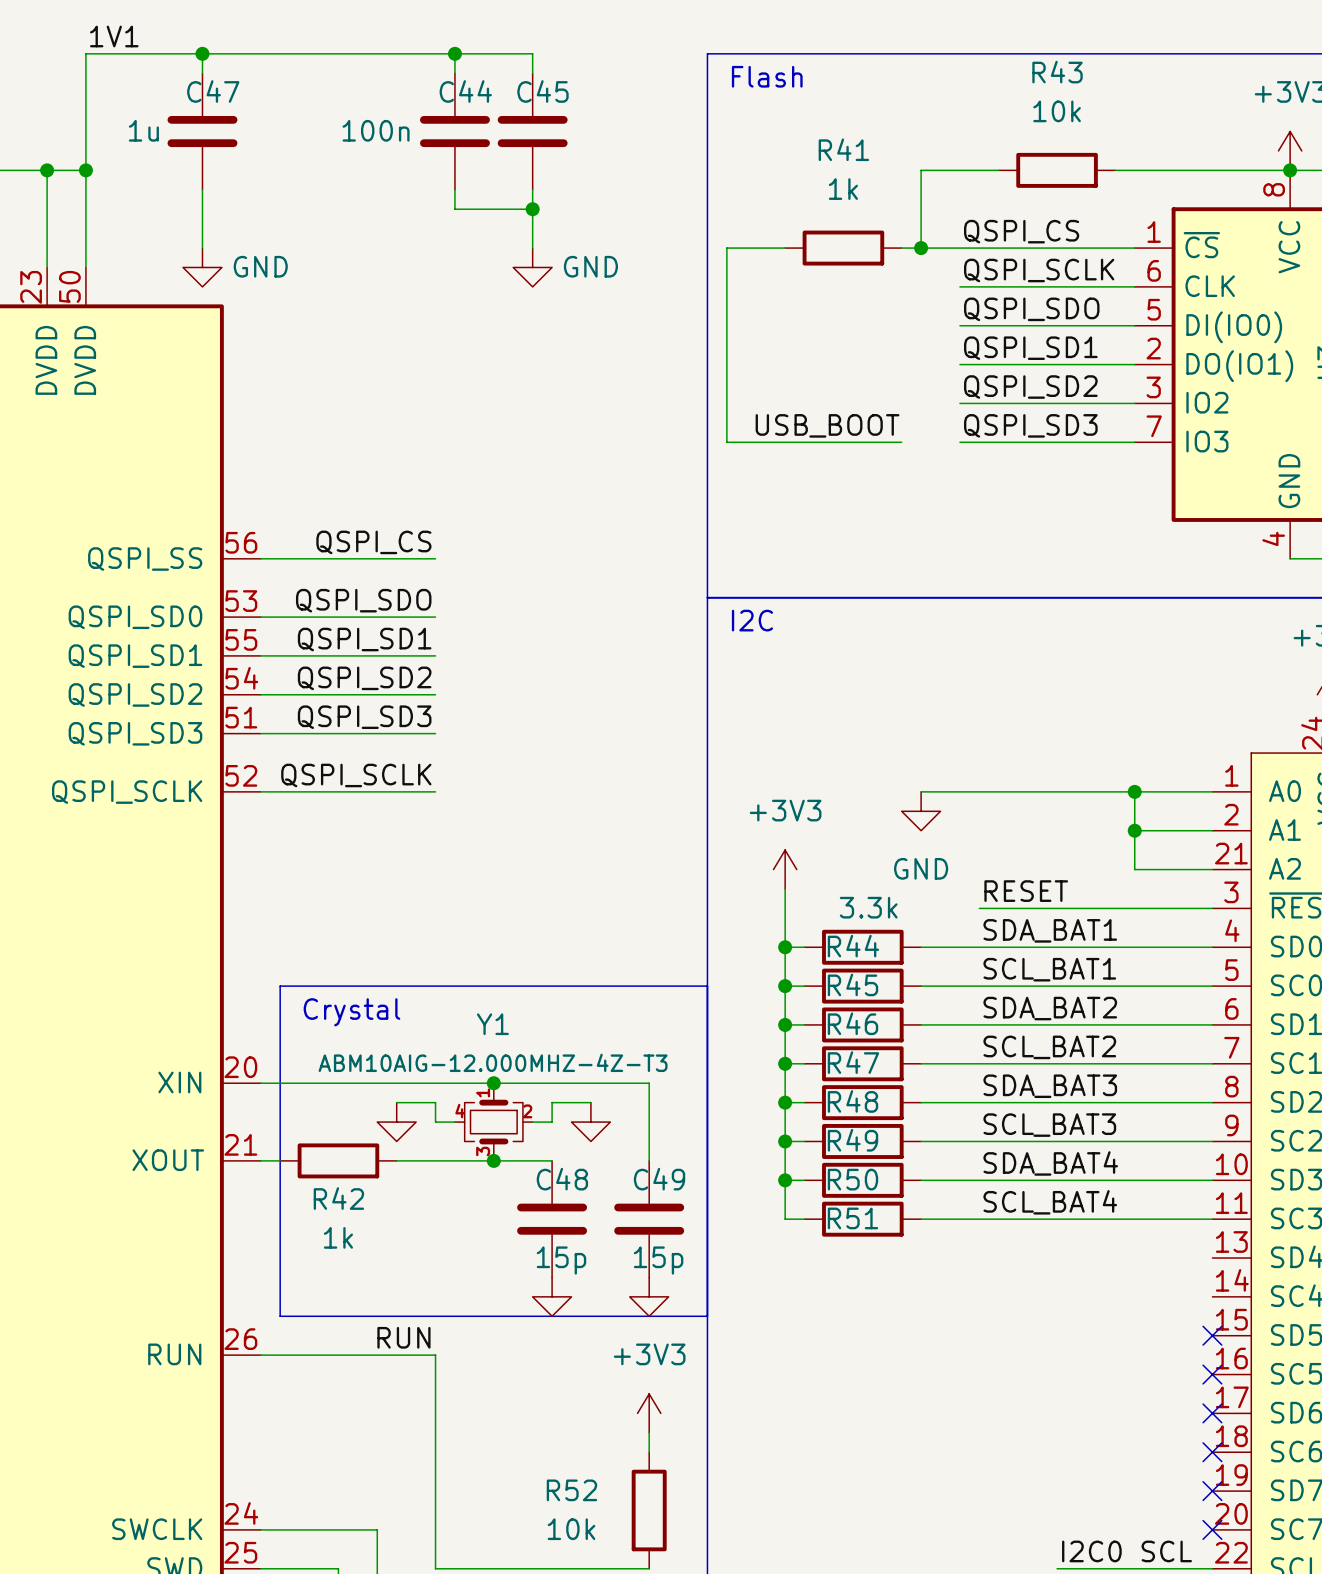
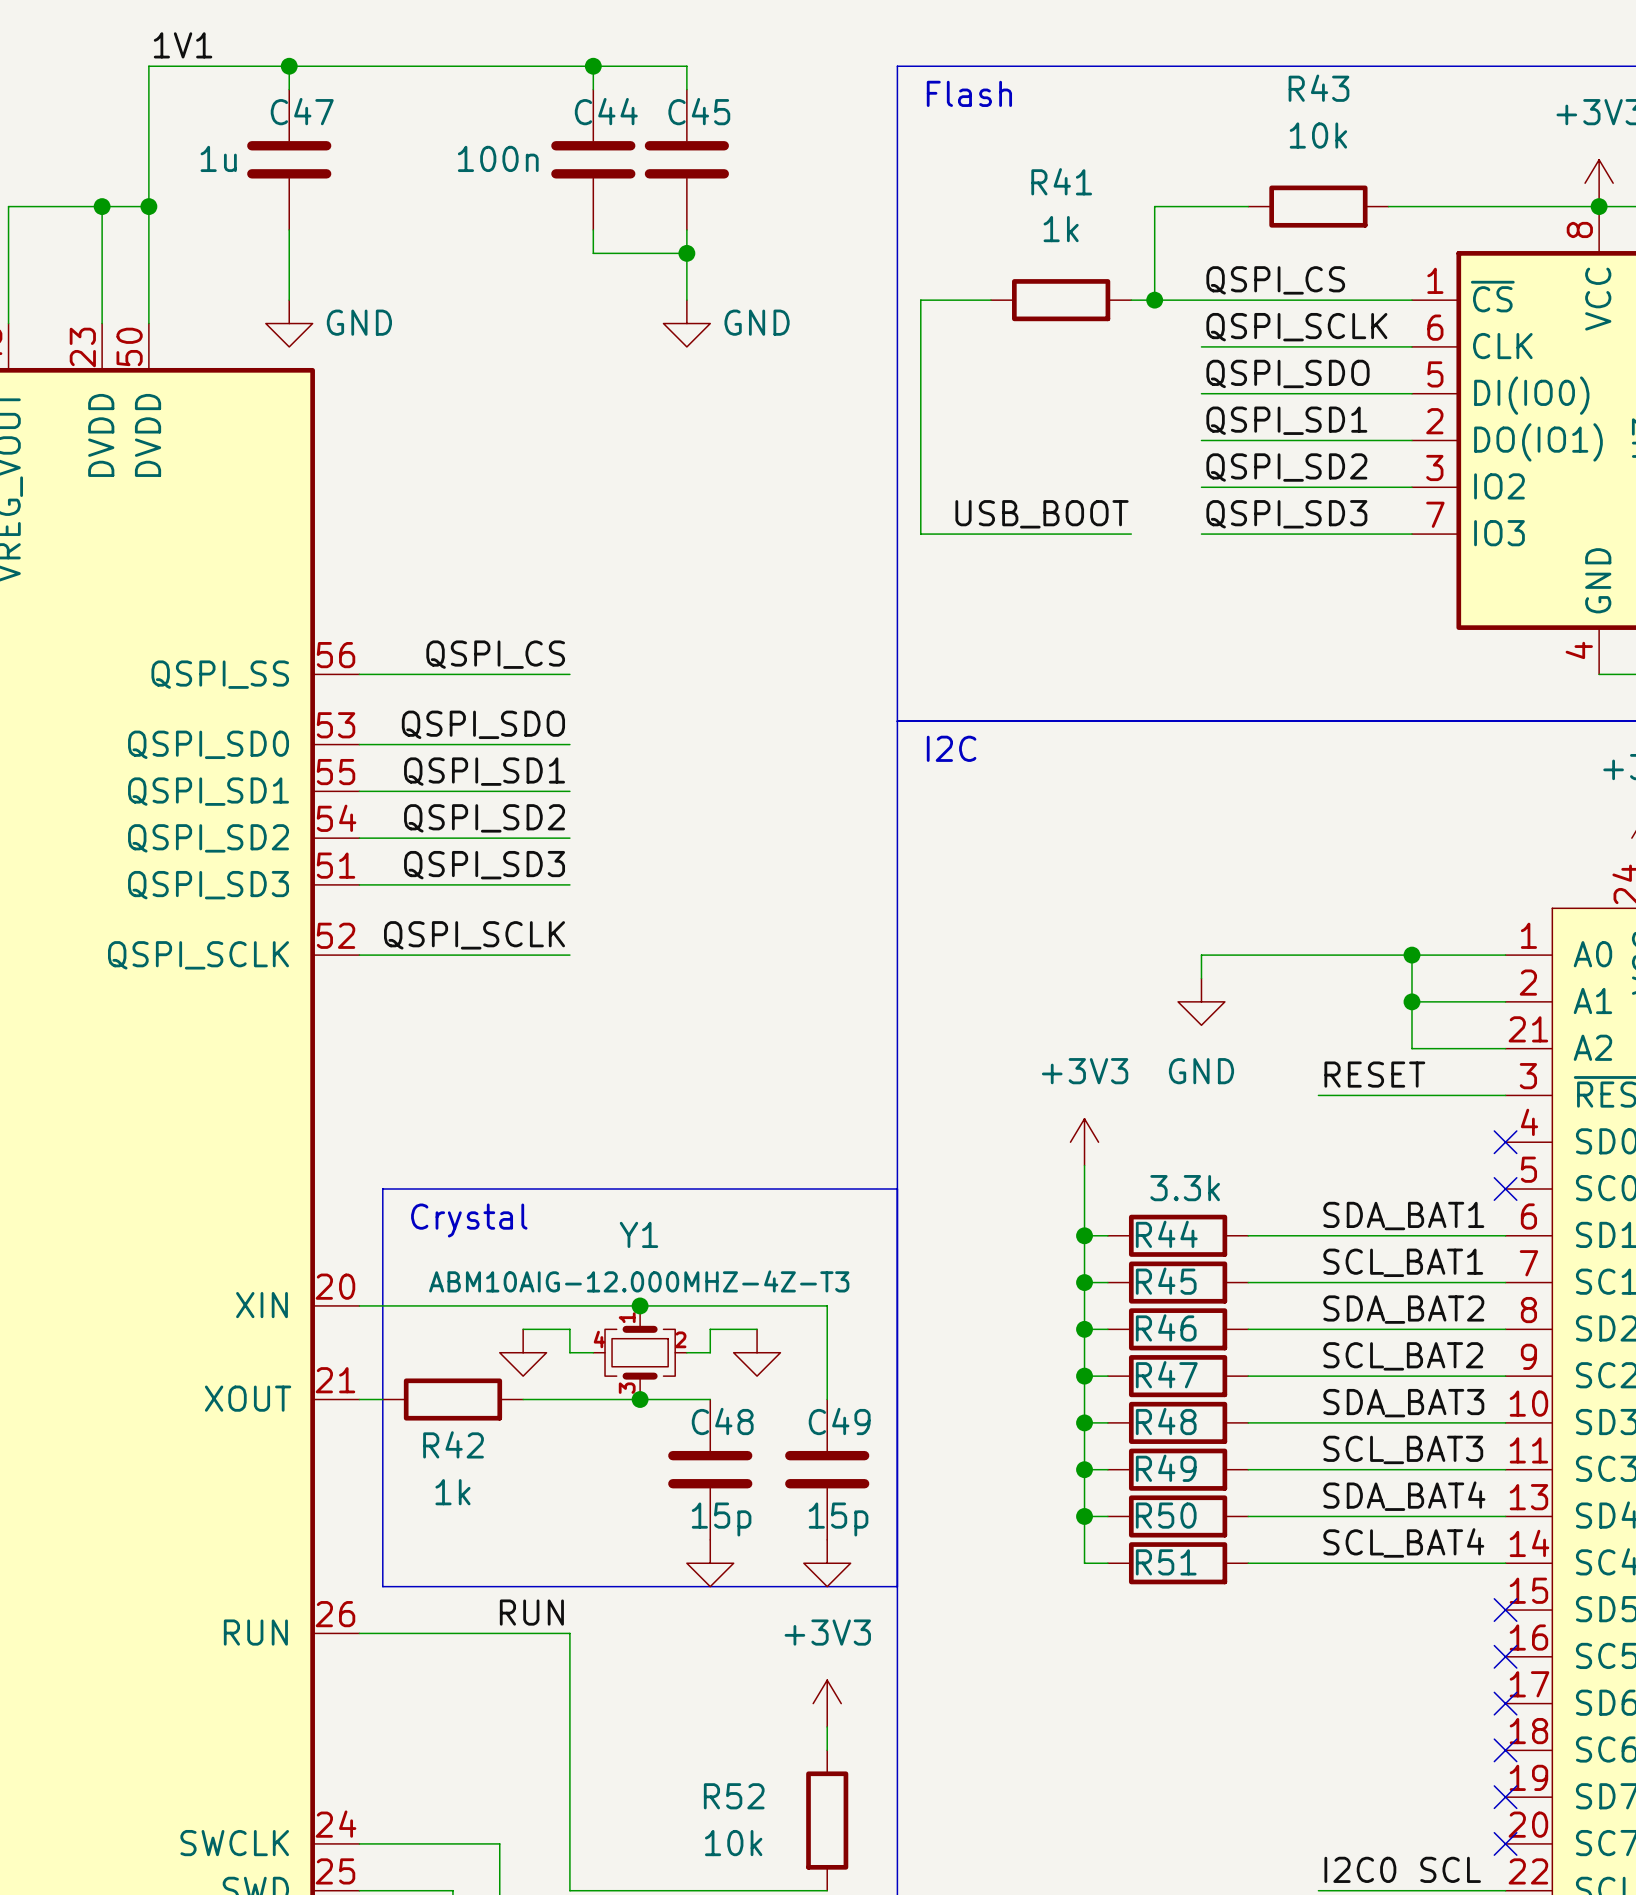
wire: (921, 791) (959, 791) -> (1201, 978) (1201, 955)
power symbol position: GND (921, 811) -> GND (1201, 1001)
power symbol position: +3V3 (785, 869) -> +3V3 (1084, 1142)
wire: (785, 888) (785, 1219) (804, 1219) -> (1084, 1165) (1084, 1563) (1107, 1563)
label position: RESET (1026, 891) -> RESET (1374, 1074)
wire: (979, 908) (1057, 908) -> none
label position: SDA_BAT1 (1050, 930) -> SDA_BAT1 (1403, 1216)
wire: (785, 947) (804, 947) -> (1084, 1235) (1107, 1235)
junction: (785, 947) -> none
R44 position: (862, 947) -> (1178, 1235)
wire: (921, 947) (1212, 947) -> none
no-connect mark: none -> (1505, 1142)
label position: SCL_BAT1 (1049, 969) -> SCL_BAT1 (1403, 1262)
wire: (785, 986) (804, 986) -> (1084, 1282) (1107, 1282)
junction: (785, 986) -> none
R45 position: (862, 986) -> (1178, 1282)
wire: (921, 986) (1212, 986) -> none
no-connect mark: none -> (1505, 1189)
label position: SDA_BAT2 (1050, 1008) -> SDA_BAT2 (1403, 1309)
wire: (785, 1024) (804, 1024) -> (1084, 1329) (1107, 1329)
junction: (785, 1024) -> none
junction: none -> (1084, 1235)
R46 position: (862, 1024) -> (1178, 1329)
wire: (921, 1024) (998, 1024) -> none
label position: SCL_BAT2 (1049, 1047) -> SCL_BAT2 (1403, 1356)
wire: (785, 1063) (804, 1063) -> (1084, 1376) (1107, 1376)
junction: (785, 1063) -> none
junction: none -> (1084, 1282)
R47 position: (862, 1063) -> (1178, 1376)
wire: (921, 1063) (998, 1063) -> none
label position: SDA_BAT3 (1050, 1086) -> SDA_BAT3 (1403, 1403)
wire: (785, 1102) (804, 1102) -> (1084, 1422) (1107, 1422)
junction: (785, 1102) -> none
junction: none -> (1084, 1329)
R48 position: (862, 1102) -> (1178, 1422)
wire: (921, 1102) (998, 1102) -> none
label position: SCL_BAT3 (1049, 1125) -> SCL_BAT3 (1403, 1449)
wire: (785, 1141) (804, 1141) -> (1084, 1469) (1107, 1469)
junction: (785, 1141) -> none
junction: none -> (1084, 1376)
R49 position: (862, 1141) -> (1178, 1469)
wire: (921, 1141) (998, 1141) -> none
label position: SDA_BAT4 (1050, 1163) -> SDA_BAT4 (1404, 1496)
wire: (785, 1180) (804, 1180) -> (1084, 1516) (1107, 1516)
junction: (785, 1180) -> none
junction: none -> (1084, 1422)
R50 position: (862, 1180) -> (1178, 1516)
wire: (921, 1180) (998, 1180) -> none
label position: SCL_BAT4 (1050, 1202) -> SCL_BAT4 (1403, 1542)
junction: none -> (1084, 1469)
R51 position: (862, 1219) -> (1178, 1563)
wire: (921, 1219) (998, 1219) -> none
junction: none -> (1084, 1516)
wire: none -> (1248, 1516) (1505, 1516)
wire: none -> (1248, 1563) (1505, 1563)

